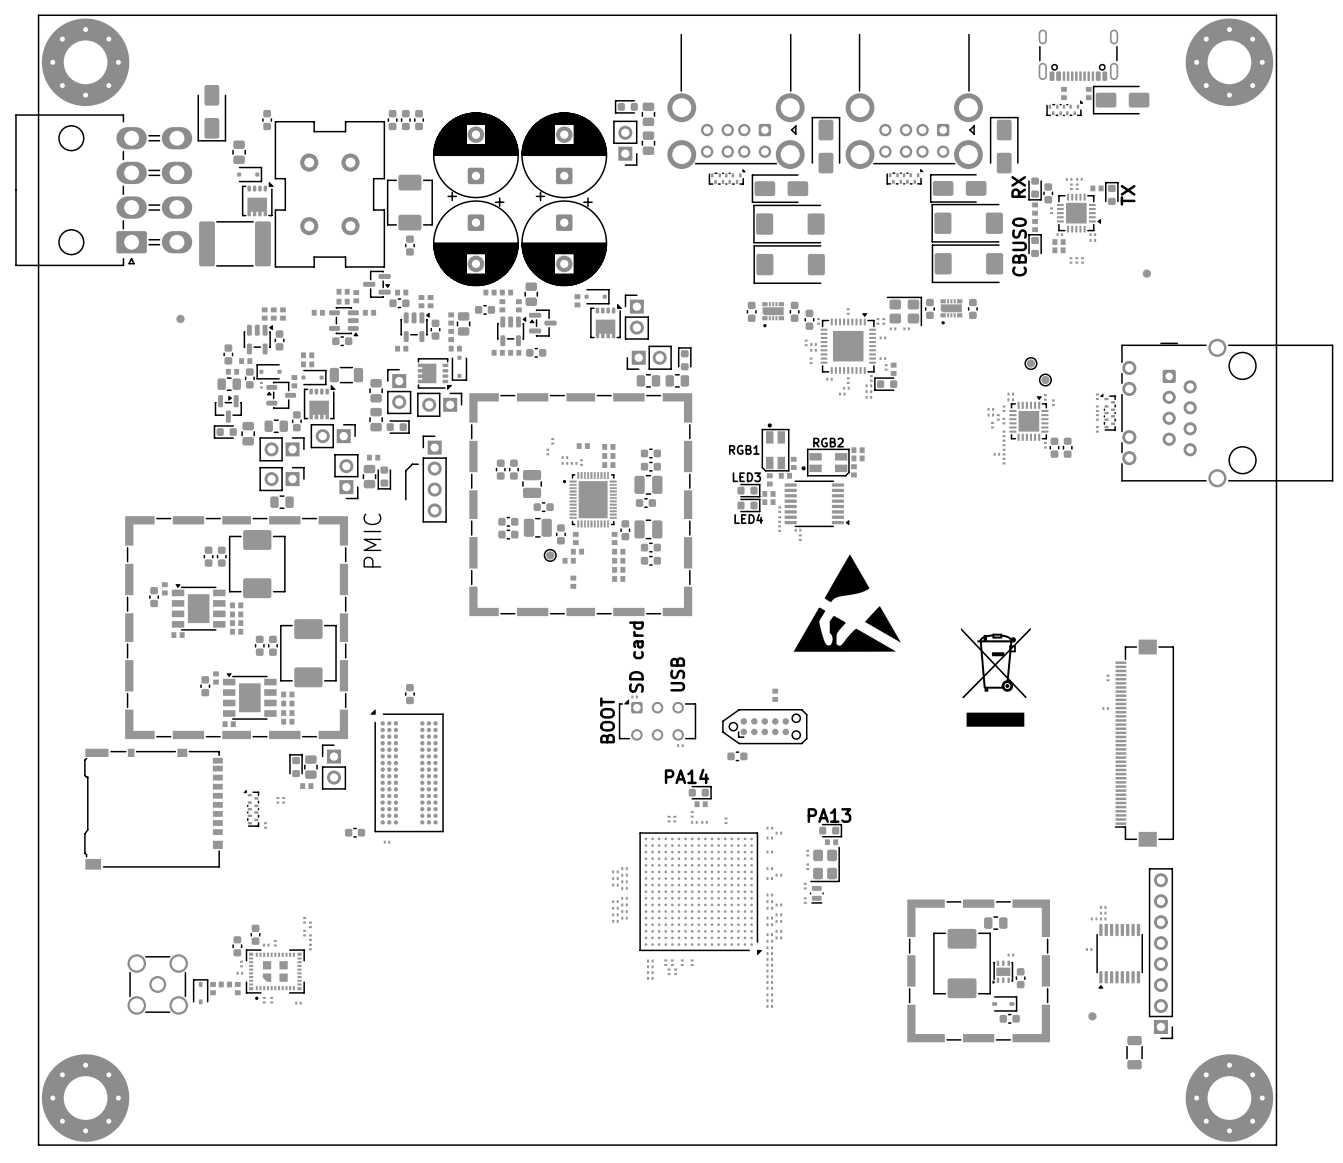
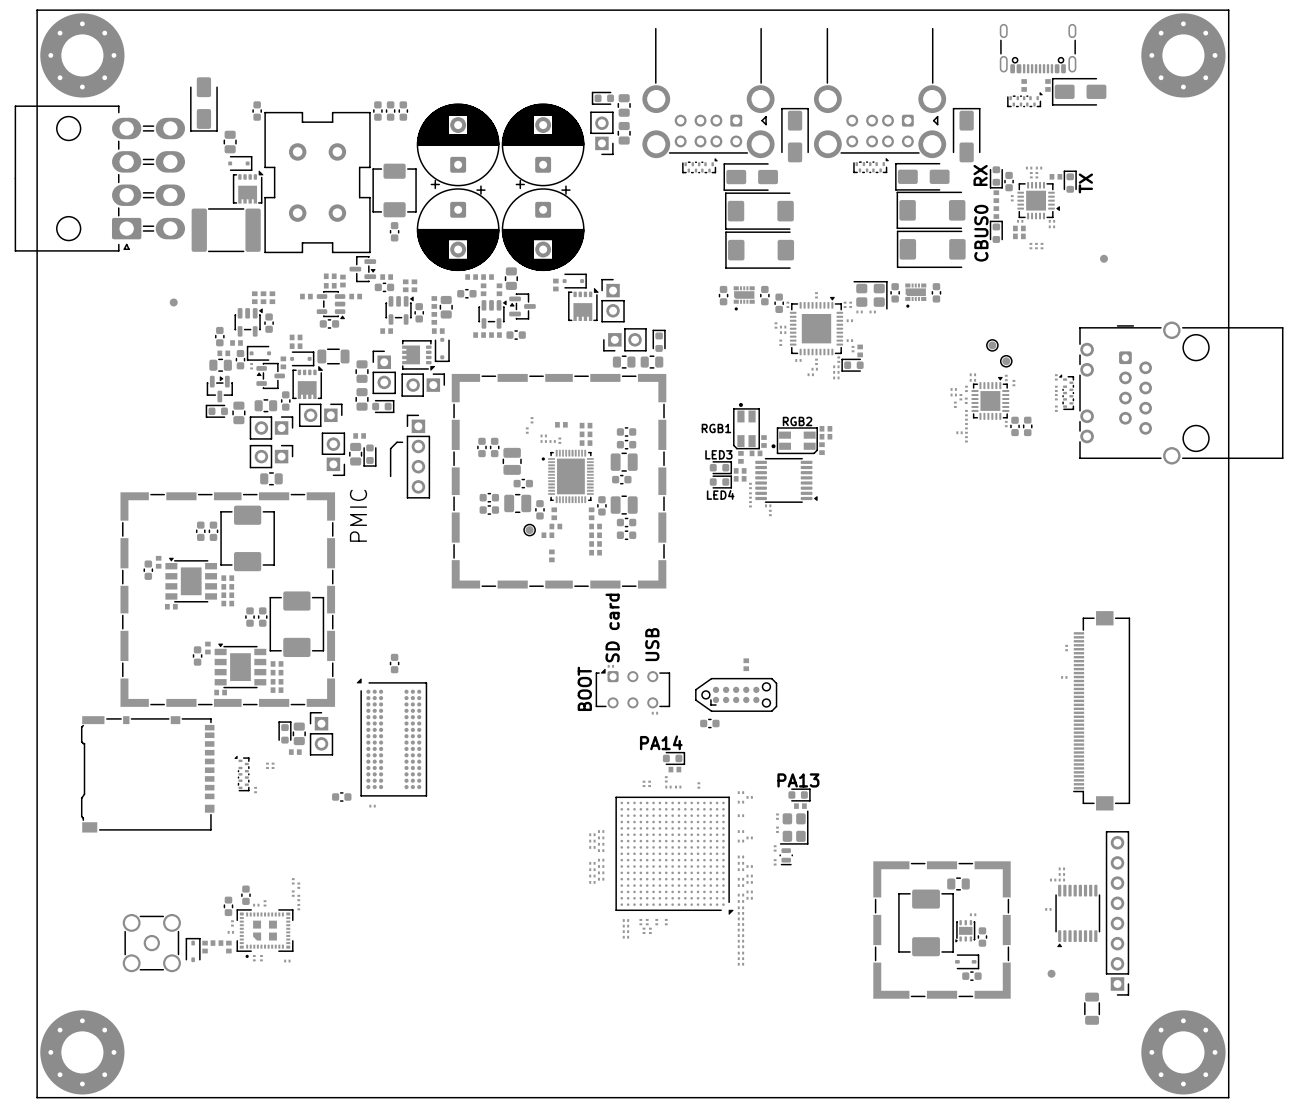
drawing: [793, 554, 901, 652] -> none
drawing: [960, 627, 1031, 727] -> none

